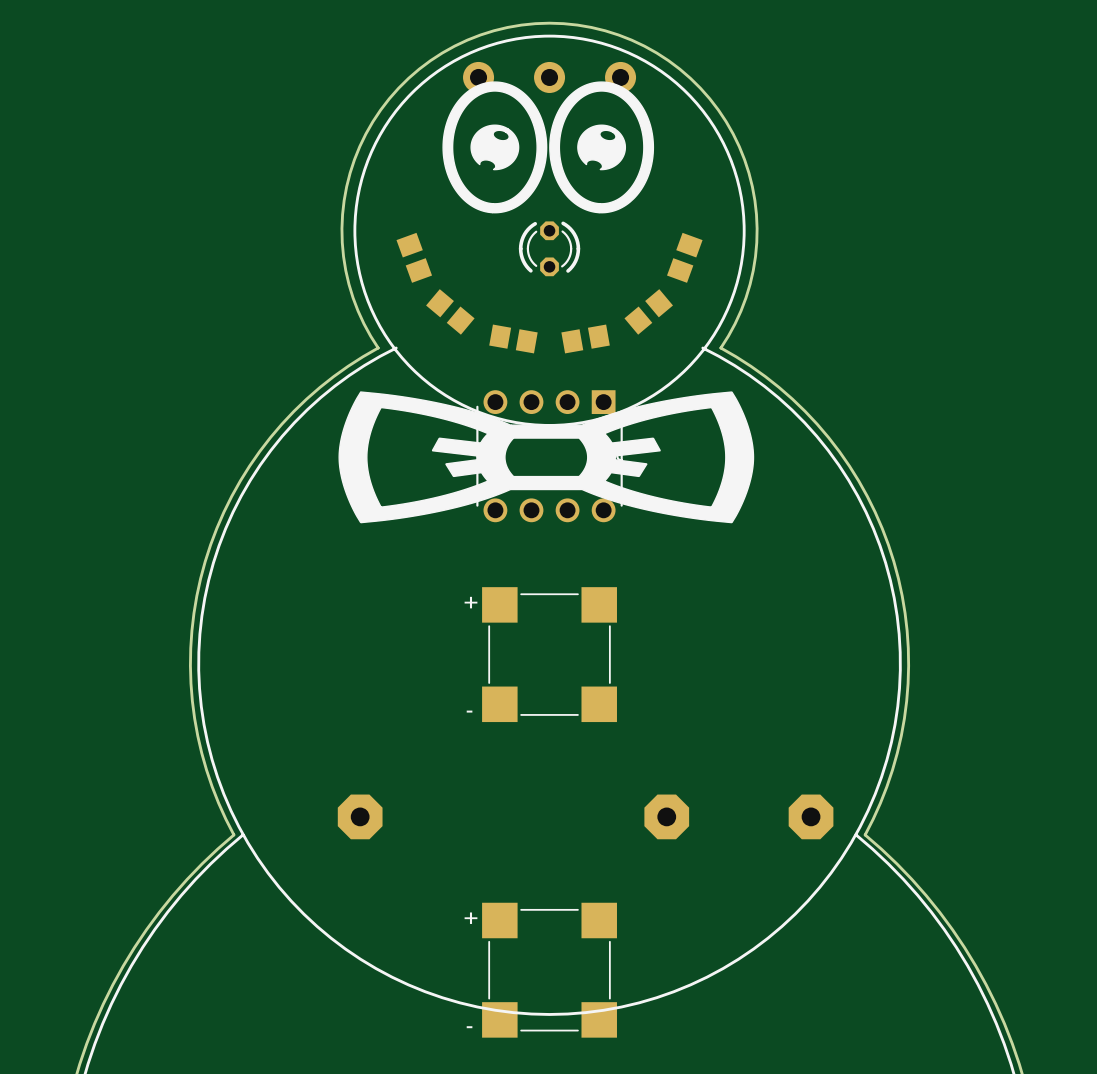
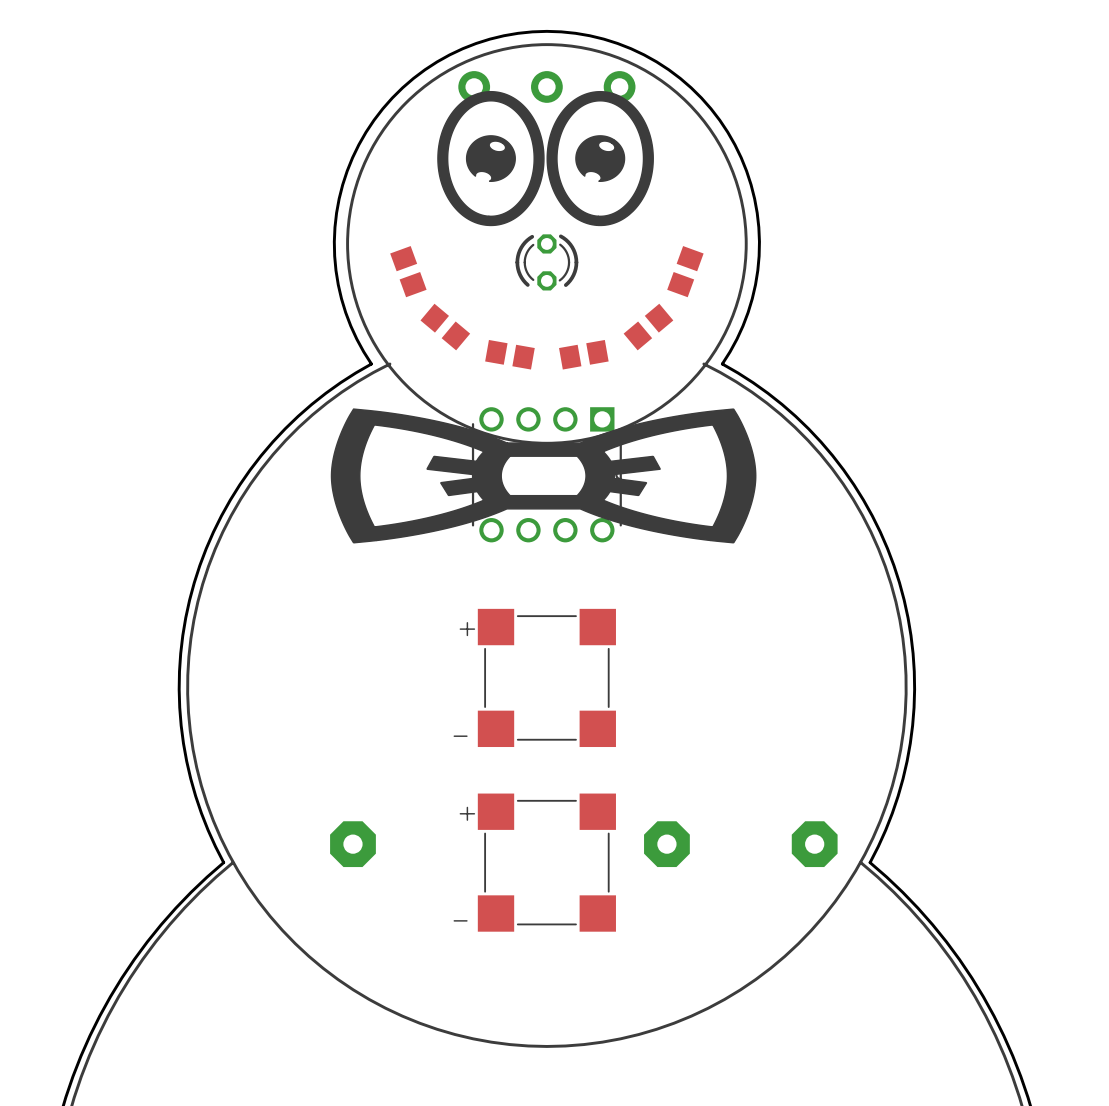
part position: (549, 970) -> (546, 862)

